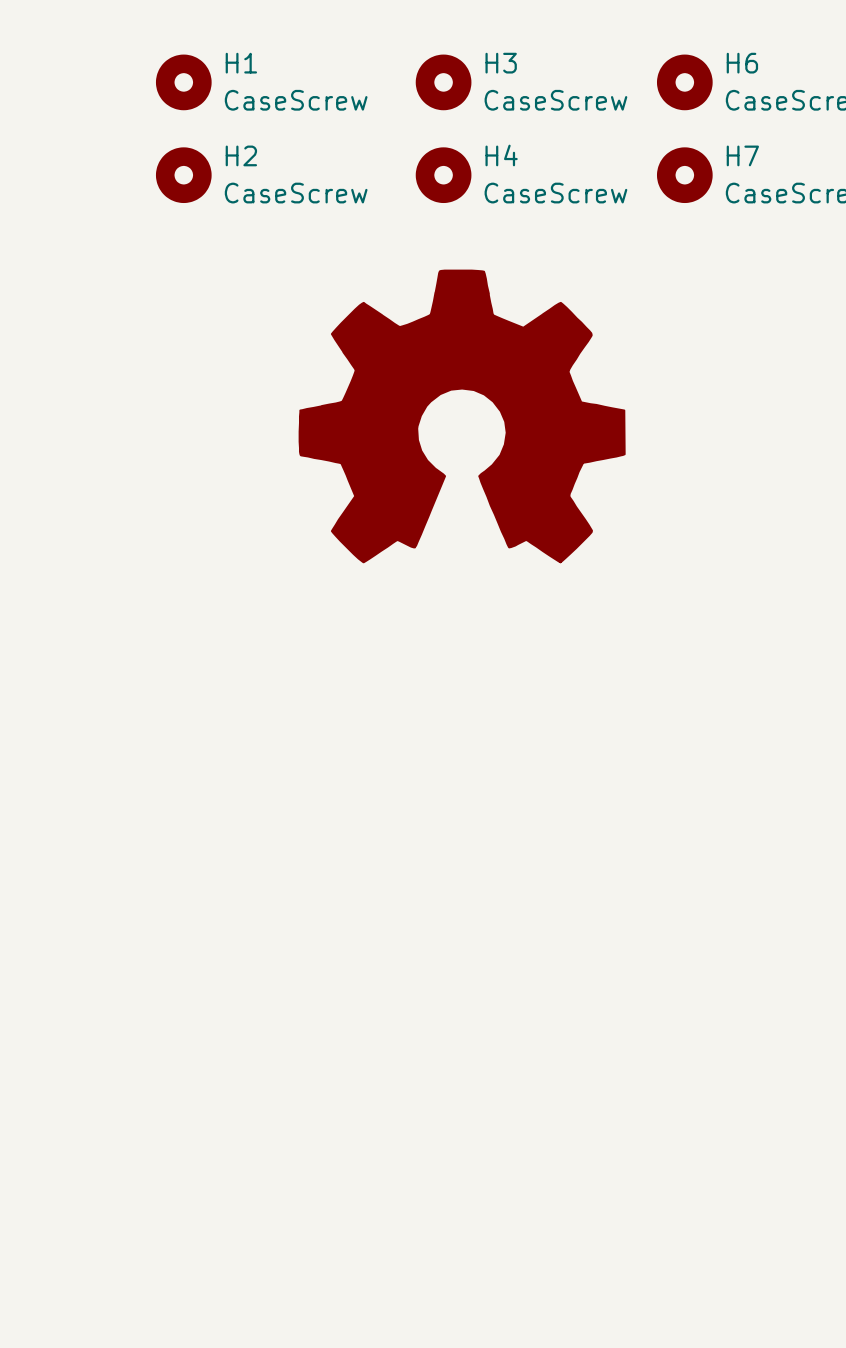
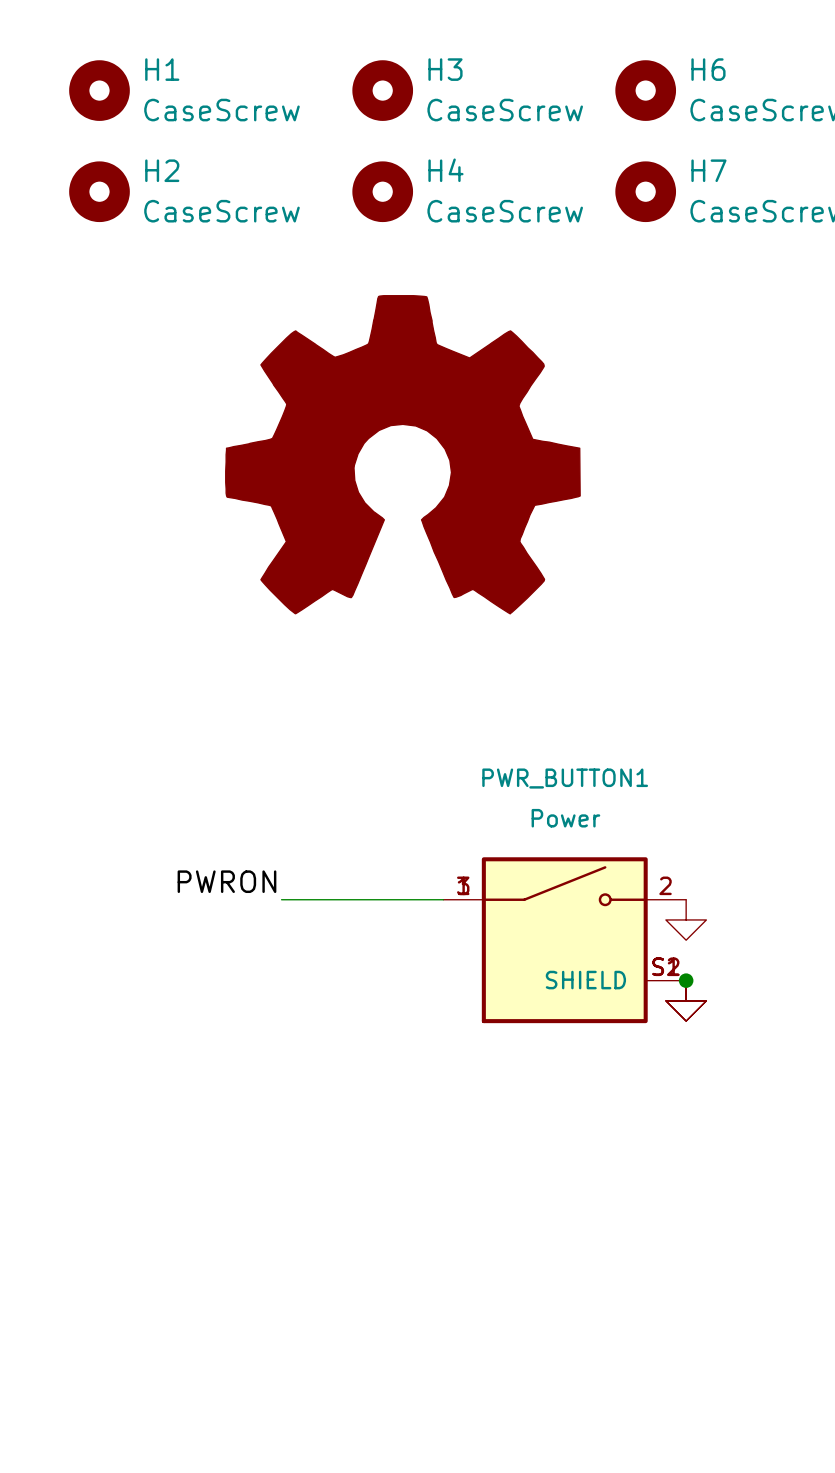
label: none -> PWRON (226, 881)
wire: none -> (281, 899) (443, 899)
power symbol: none -> (686, 919)
PWR_BUTTON1: none -> Power (564, 940)
junction: none -> (686, 980)
power symbol: none -> (686, 1000)

